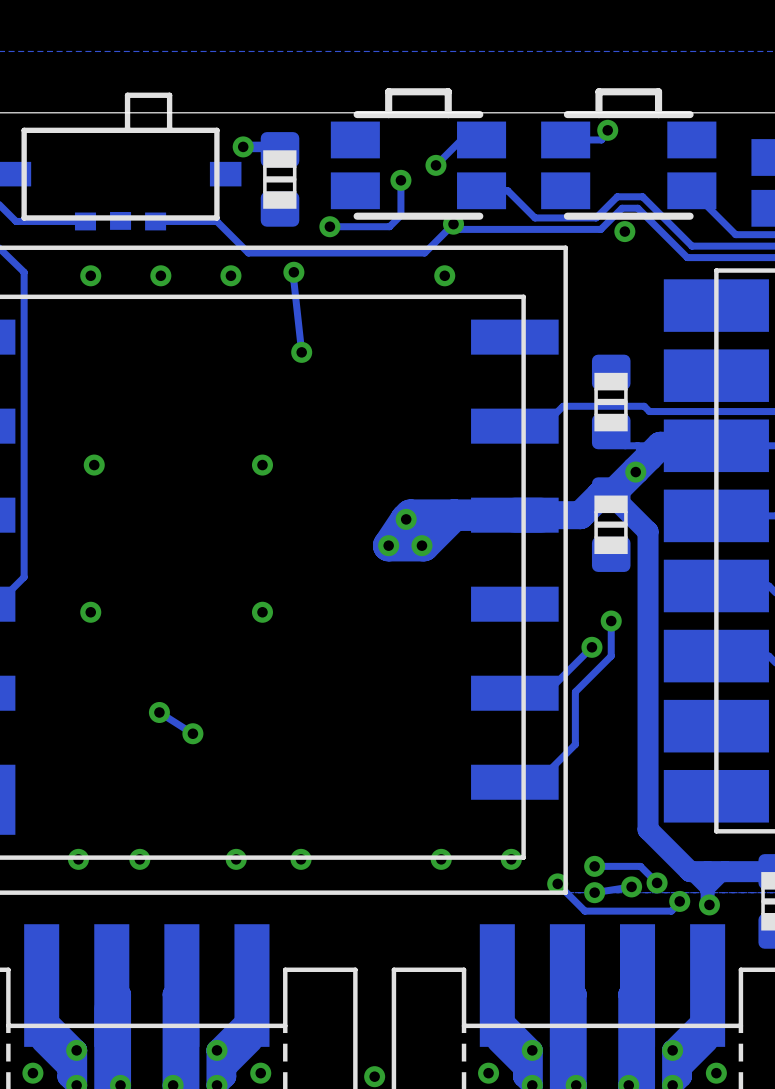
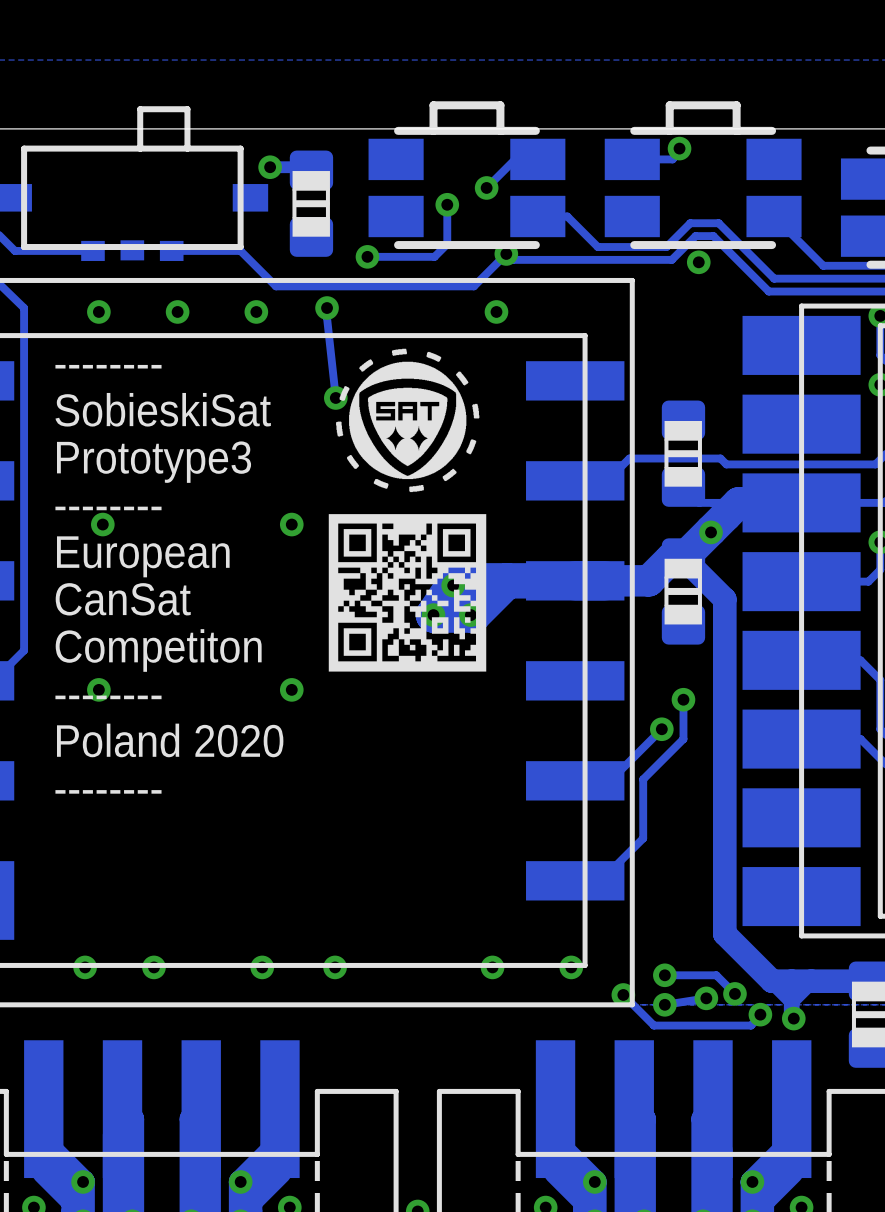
drawing: none -> [328, 348, 487, 672]
text: none -> -------- (108, 366)
text: none -> SobieskiSat (163, 409)
text: none -> Prototype3 (154, 462)
text: none -> -------- (108, 508)
text: none -> European (143, 556)
text: none -> CanSat (123, 599)
text: none -> Competiton (158, 650)
text: none -> -------- (108, 697)
text: none -> Poland 2020 (170, 740)
text: none -> -------- (108, 791)
track: (159, 712) (192, 733) -> none
via: (159, 712) -> none
via: (192, 733) -> none

